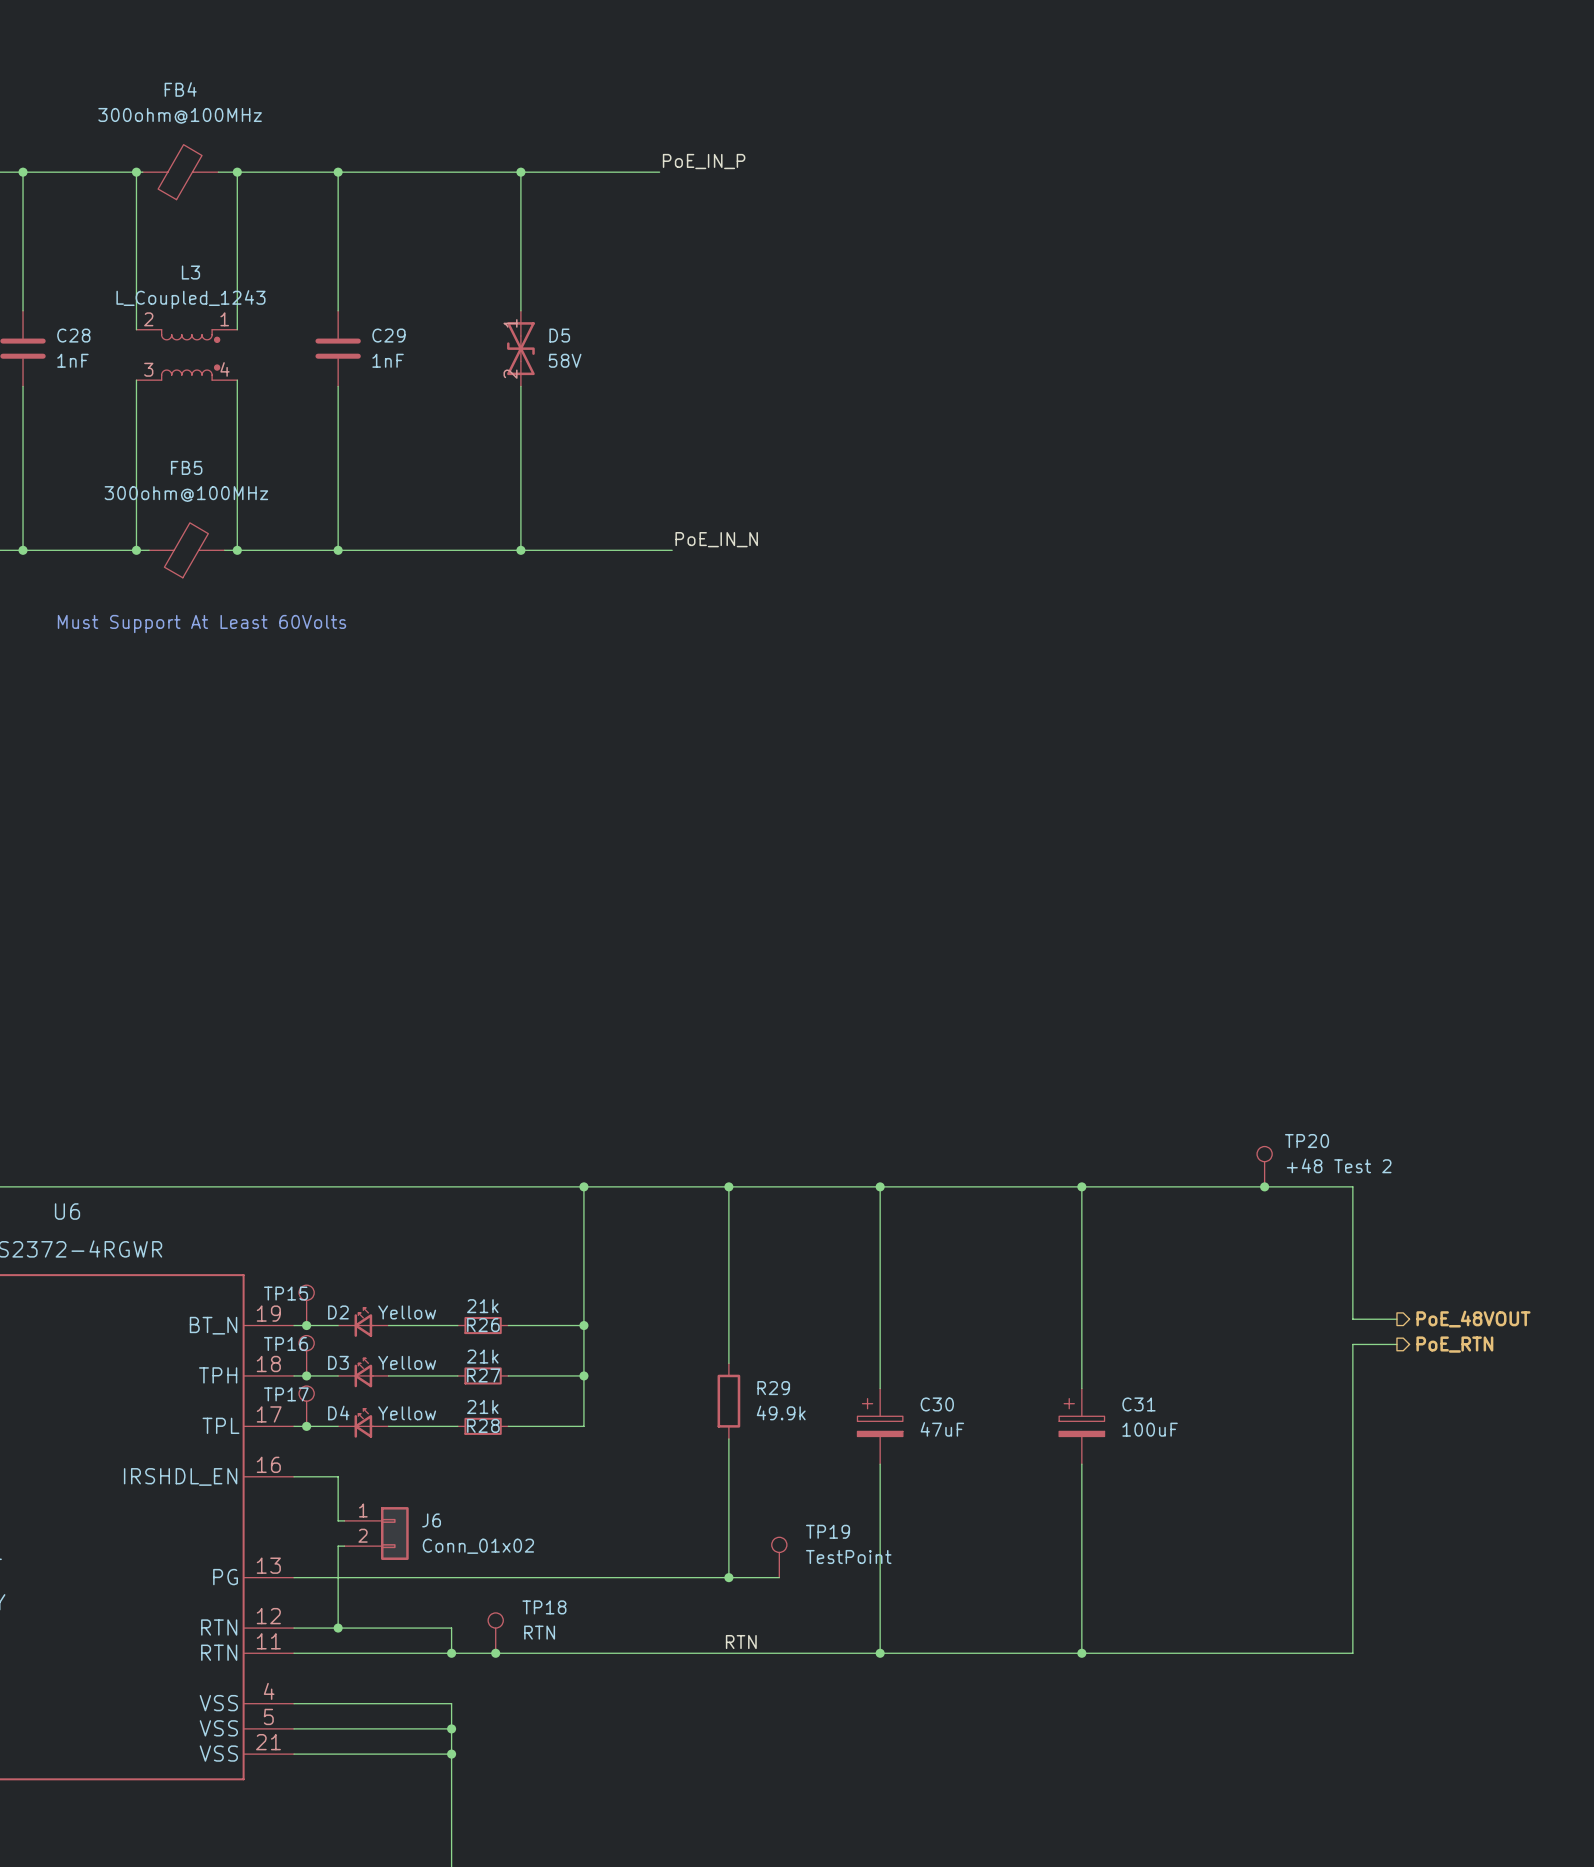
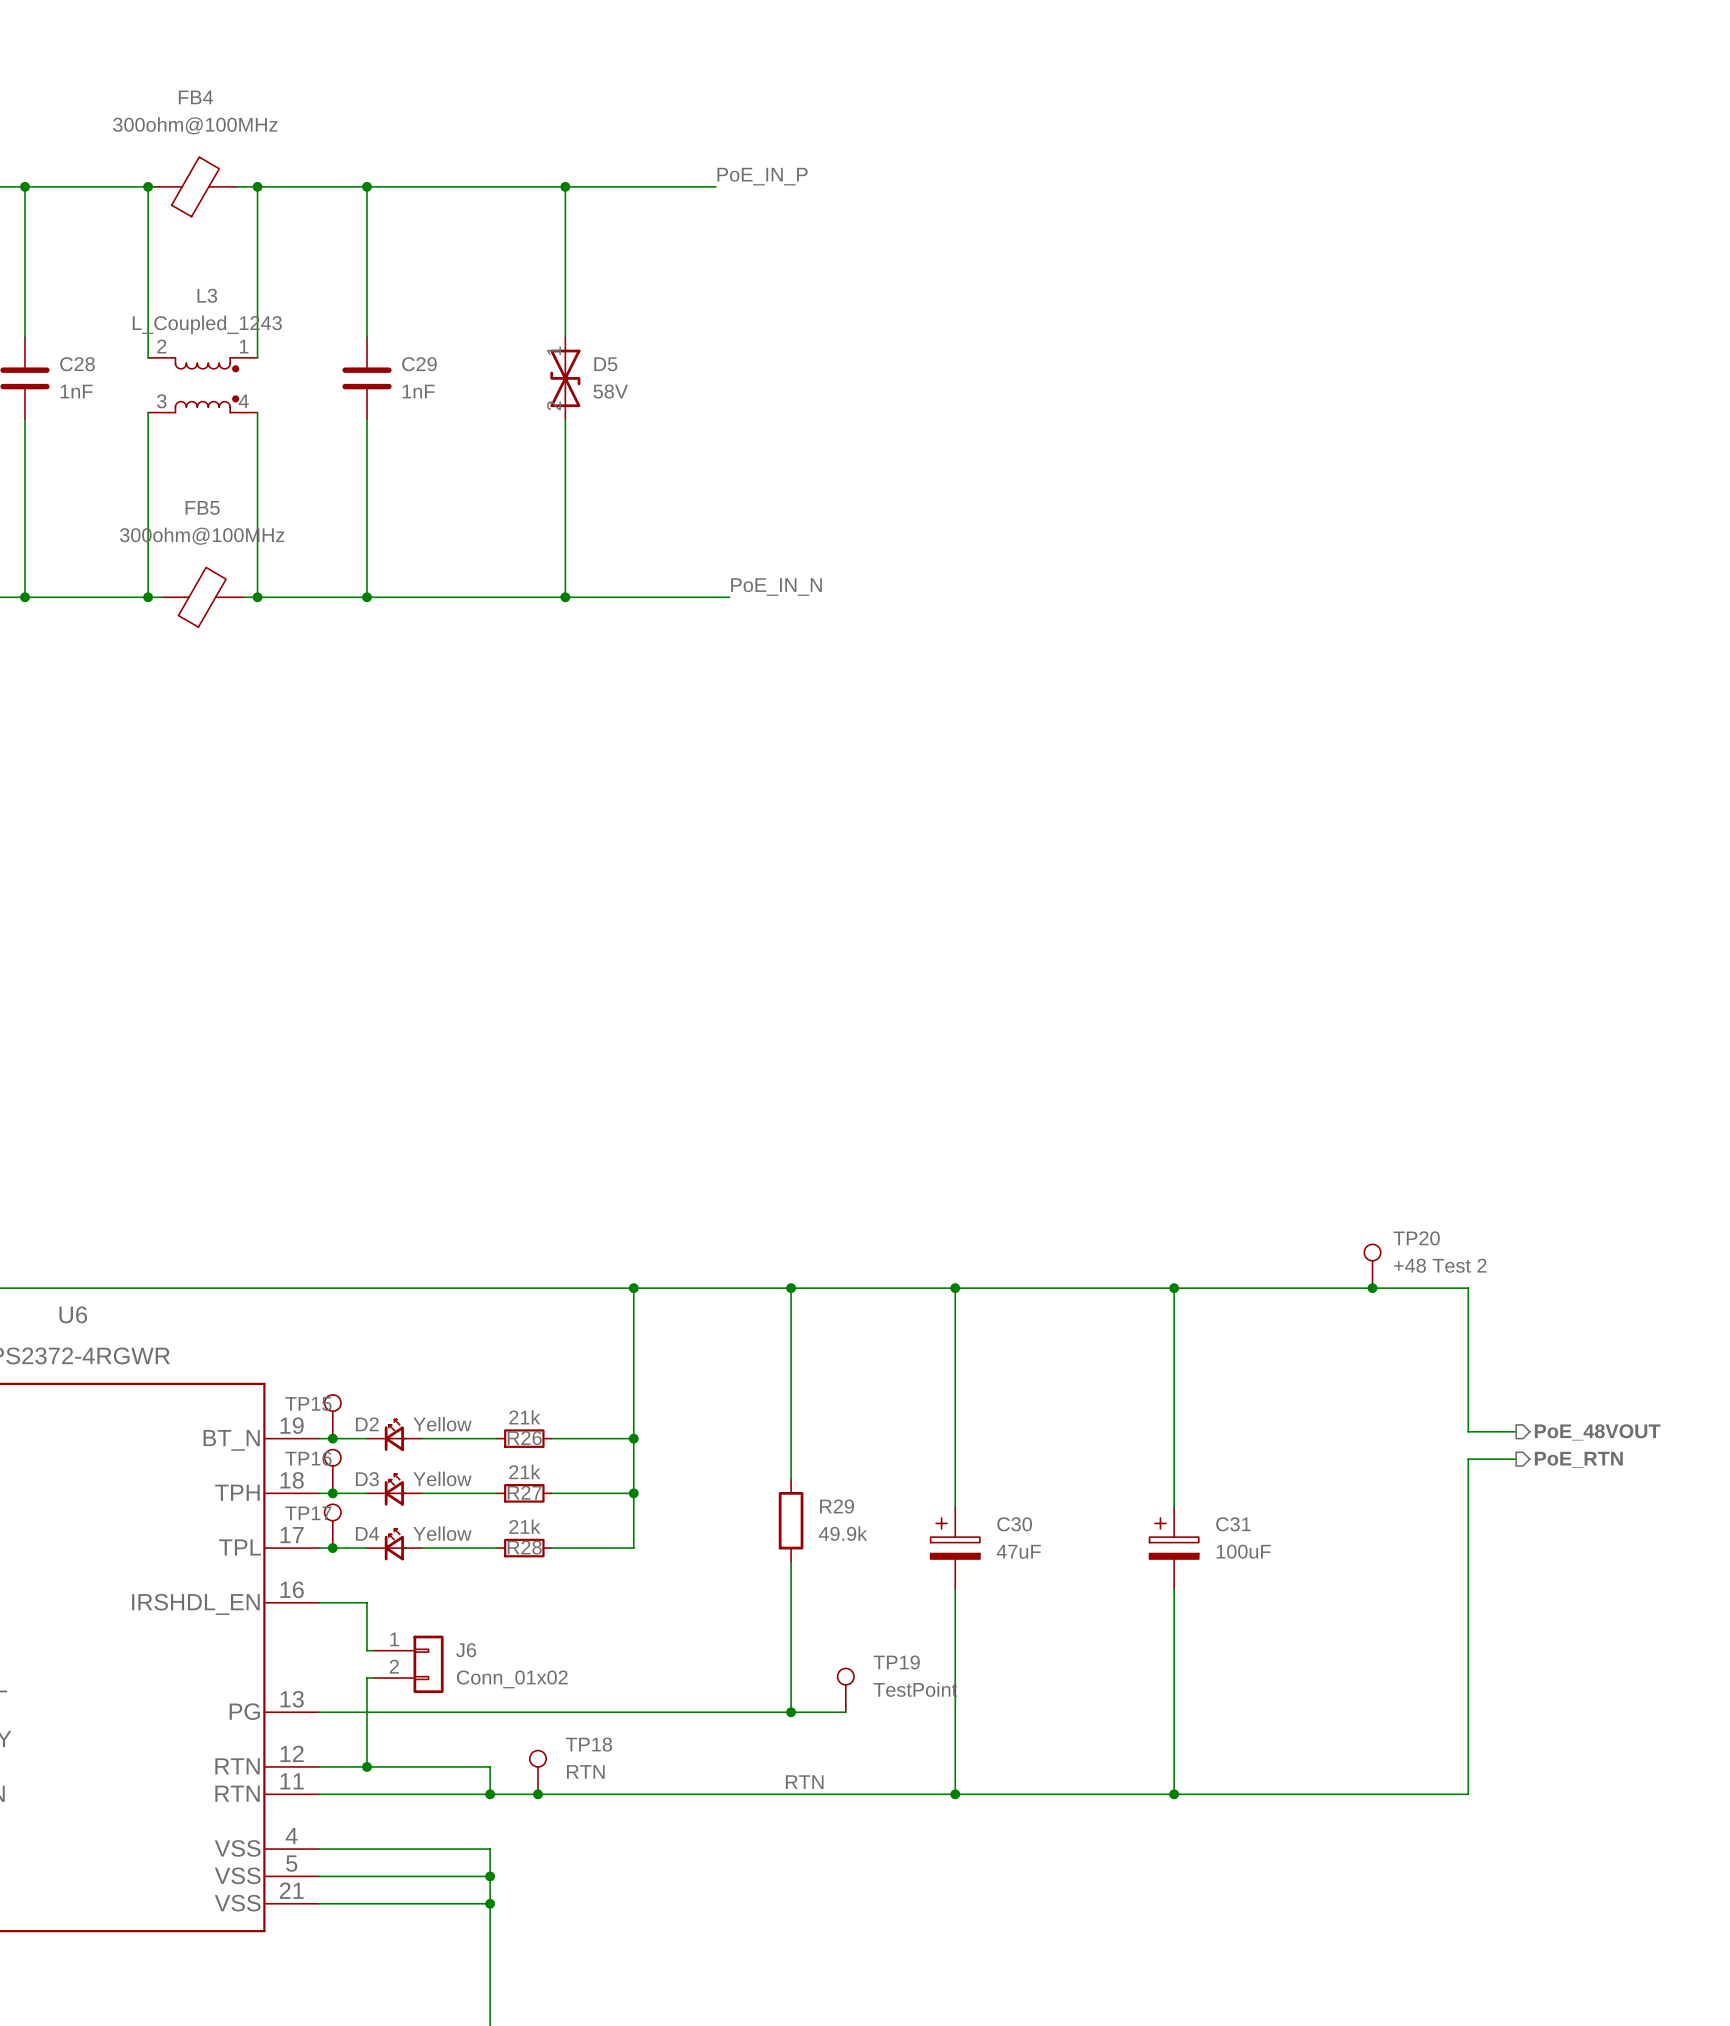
text: Must Support At Least 60Volts (201, 624) -> none

